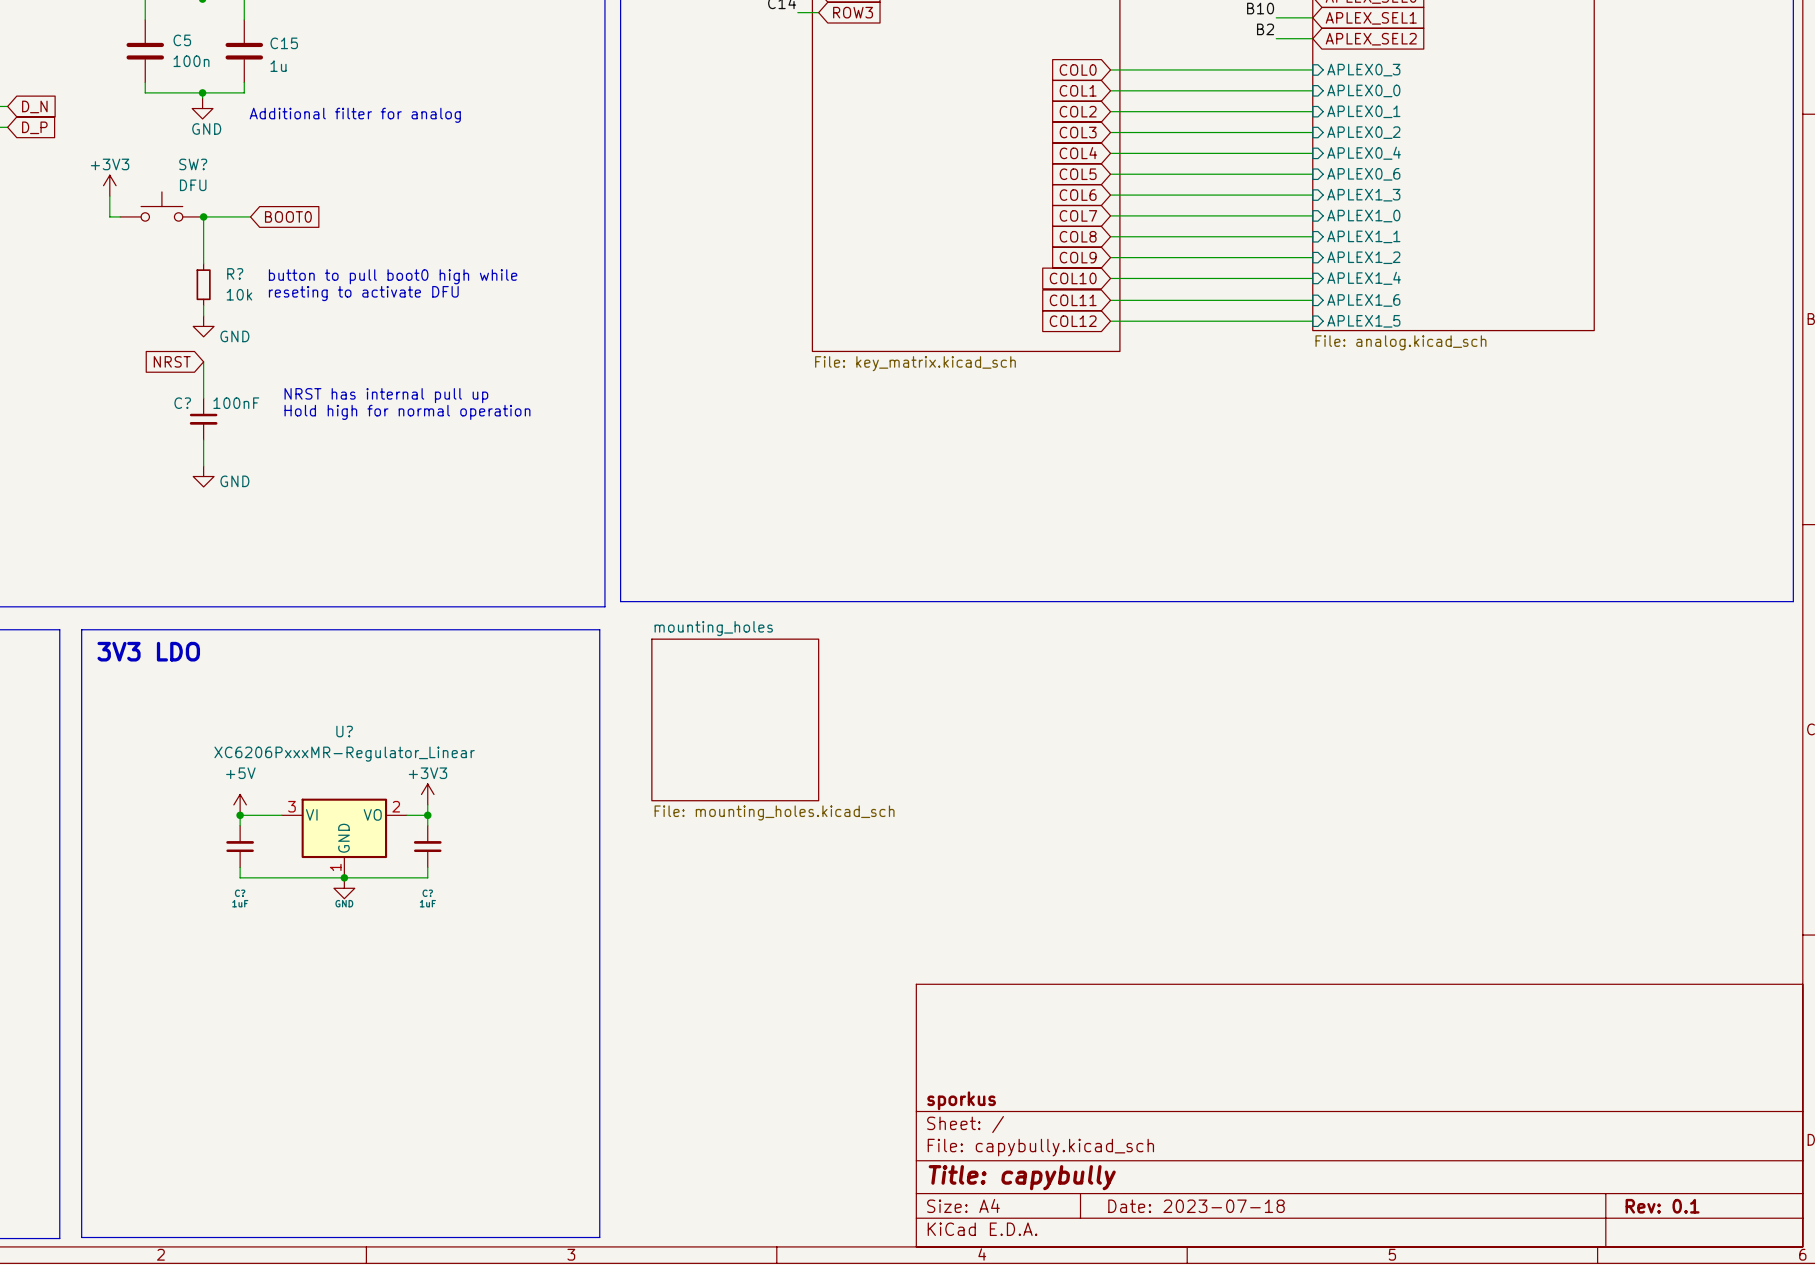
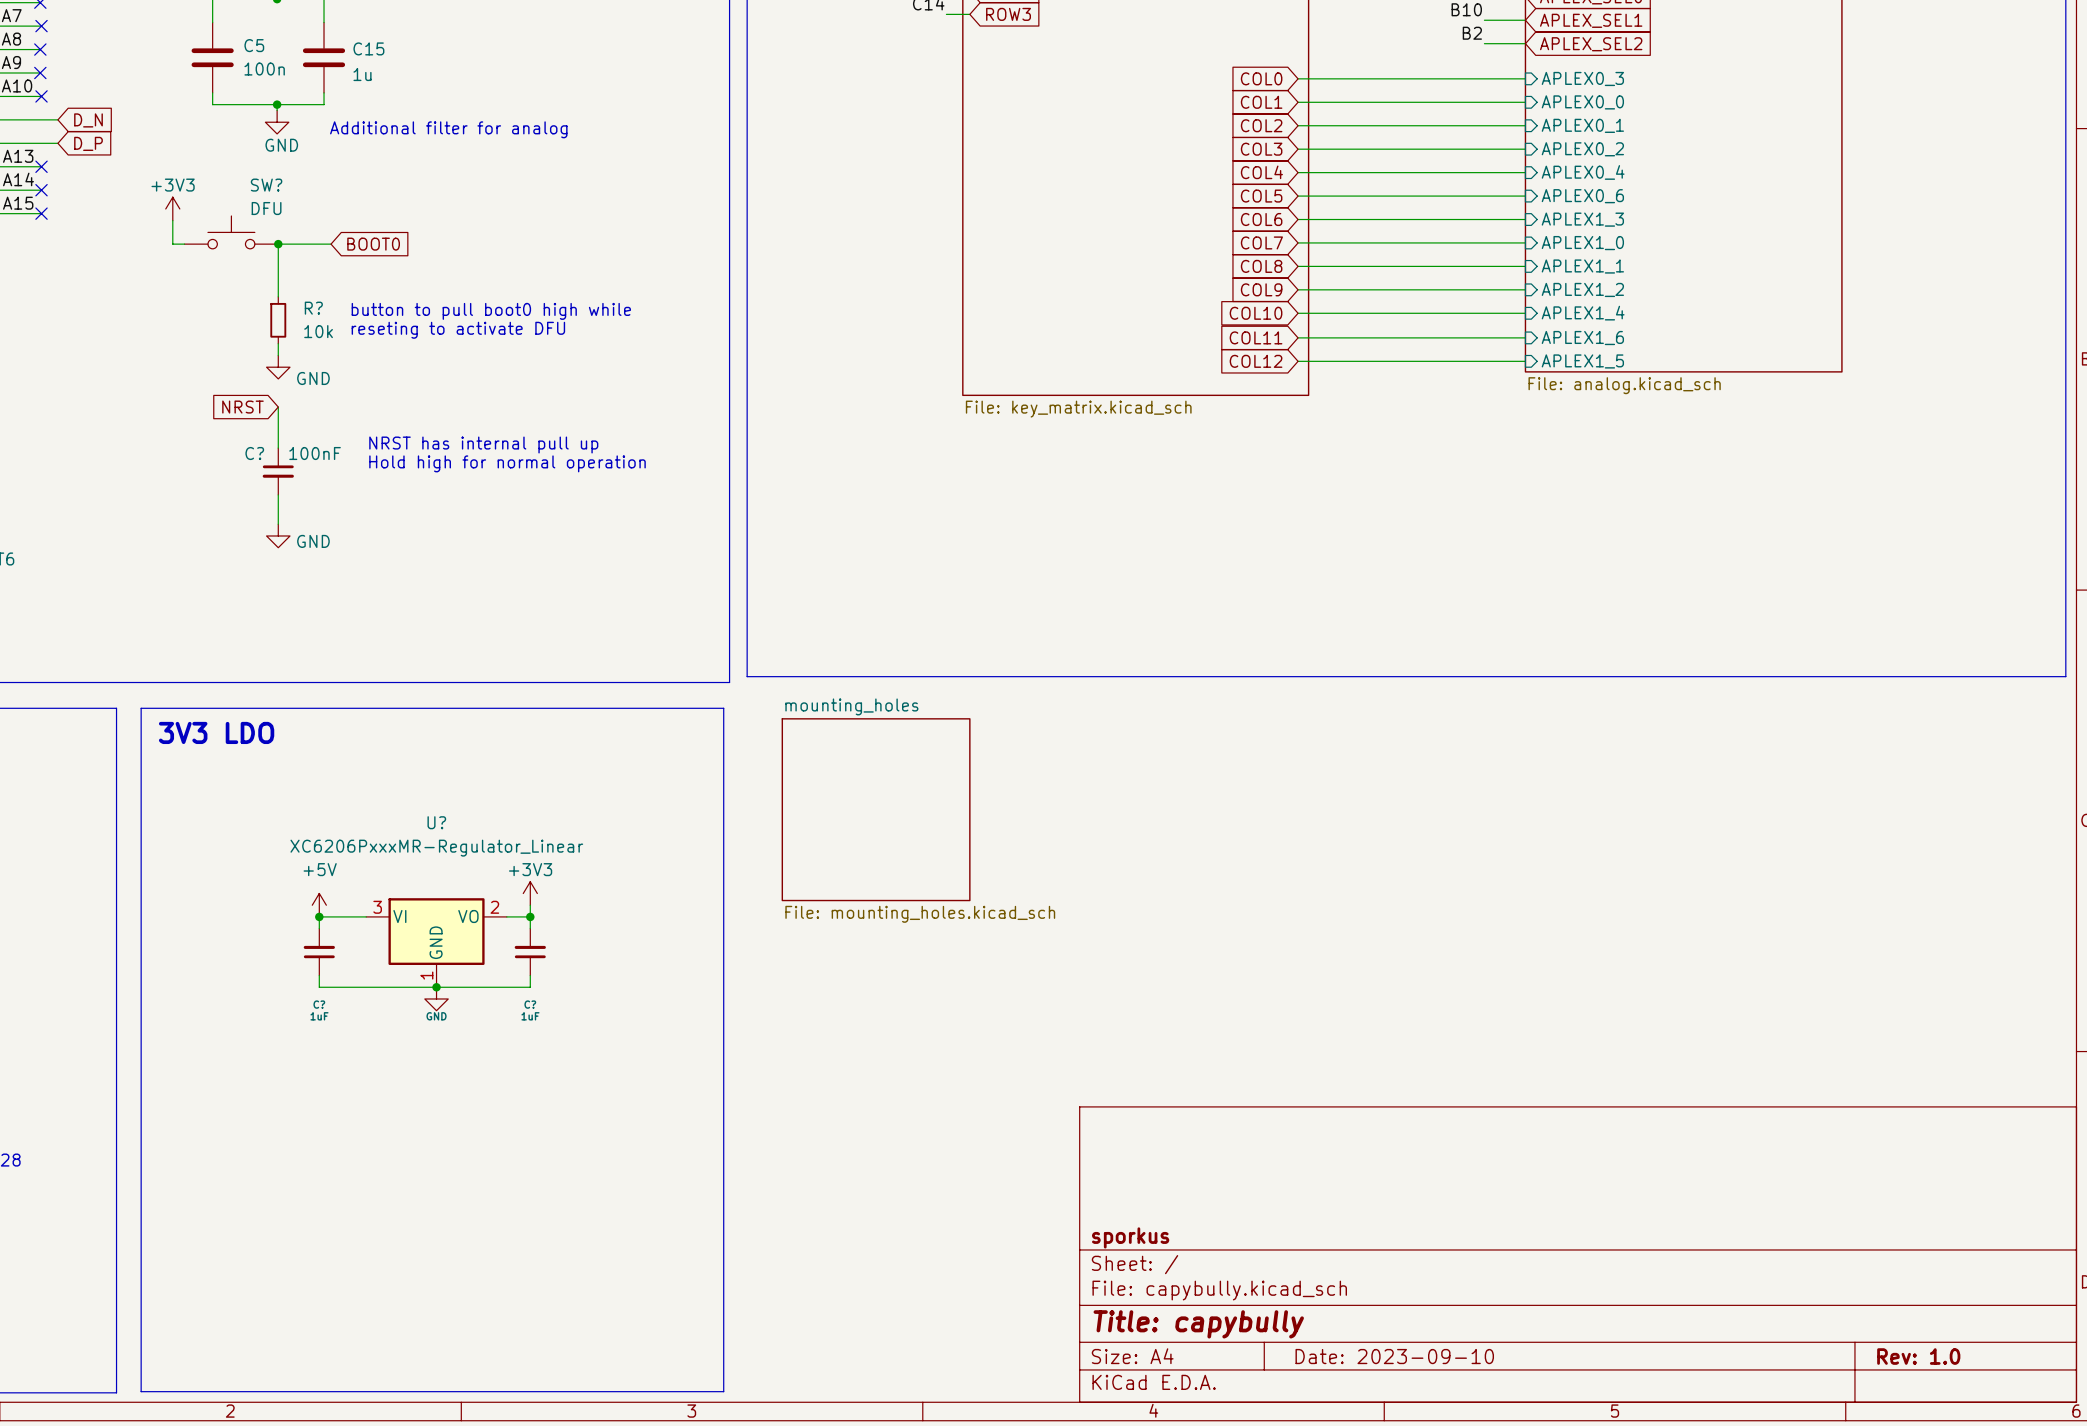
title block: Date: 2023-07-18 (1196, 1206) -> Date: 2023-09-10 (1394, 1356)
title block: Rev: 0.1 (1662, 1206) -> Rev: 1.0 (1918, 1356)

